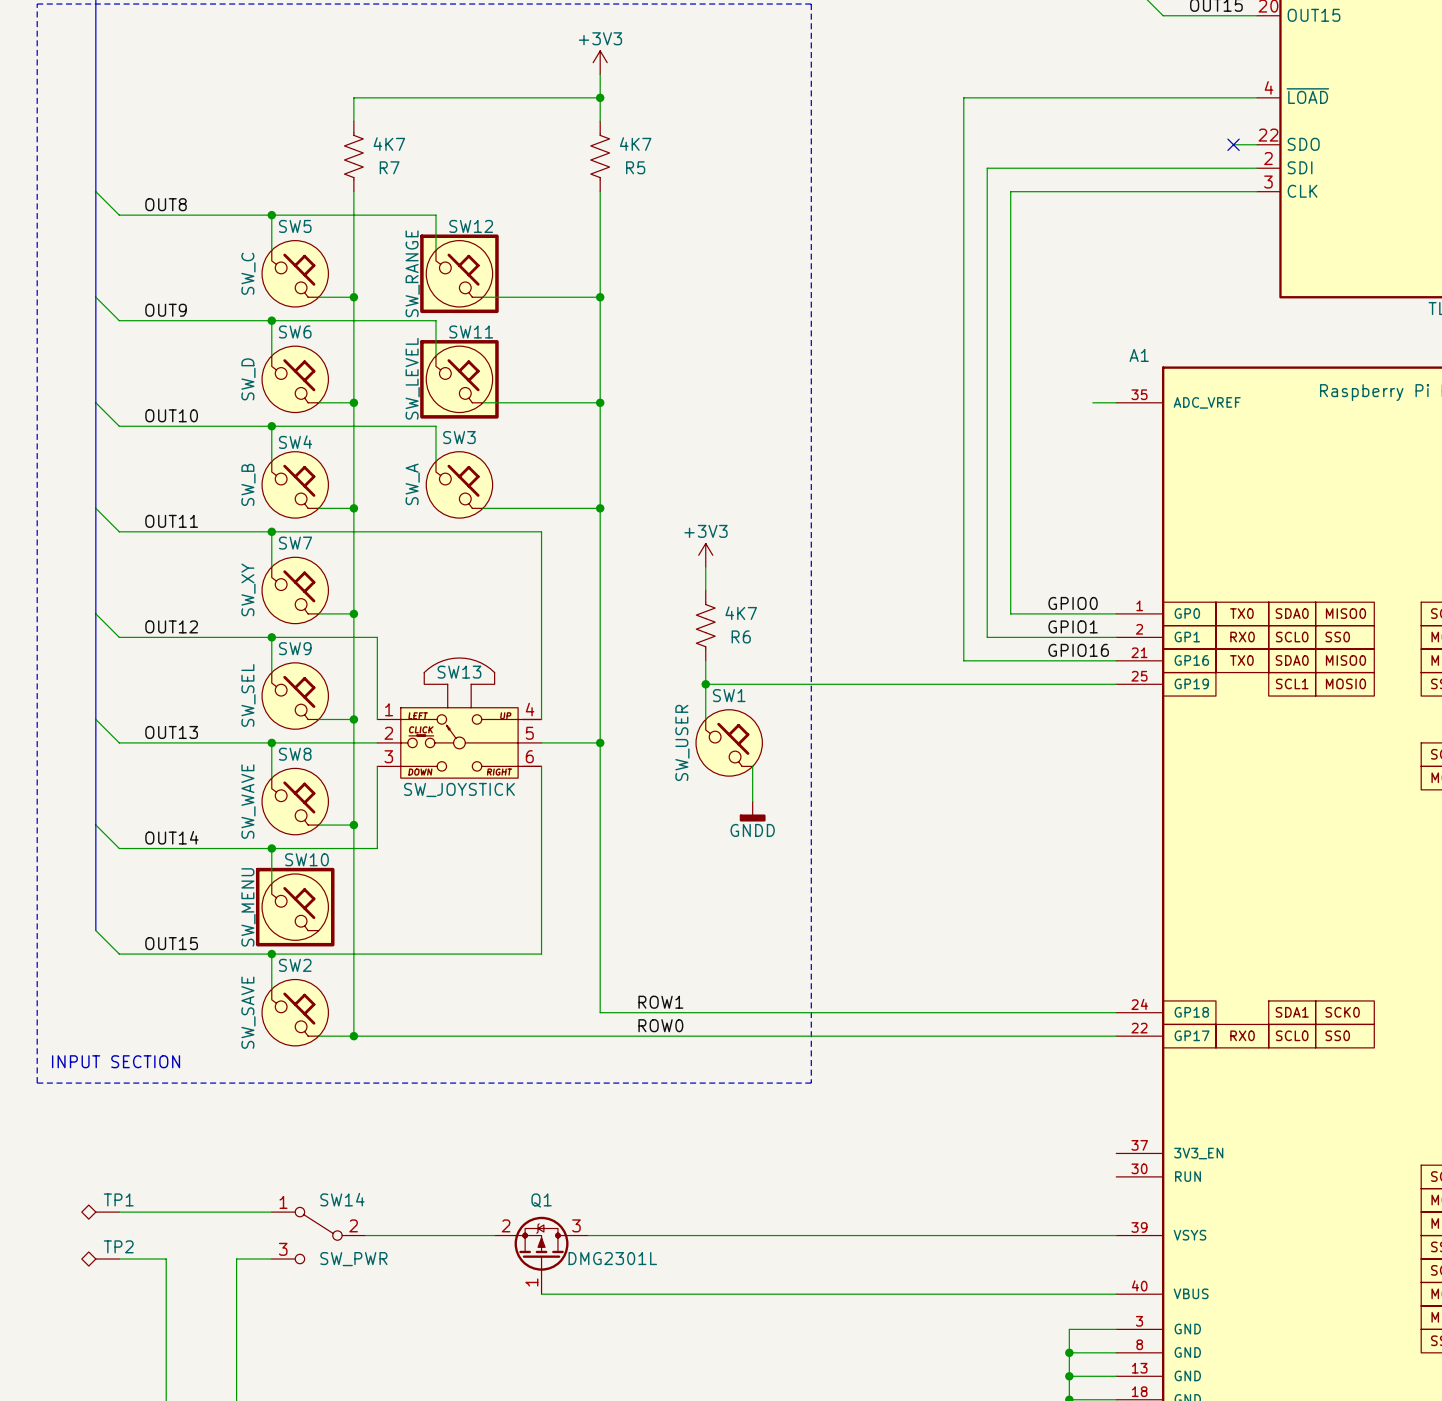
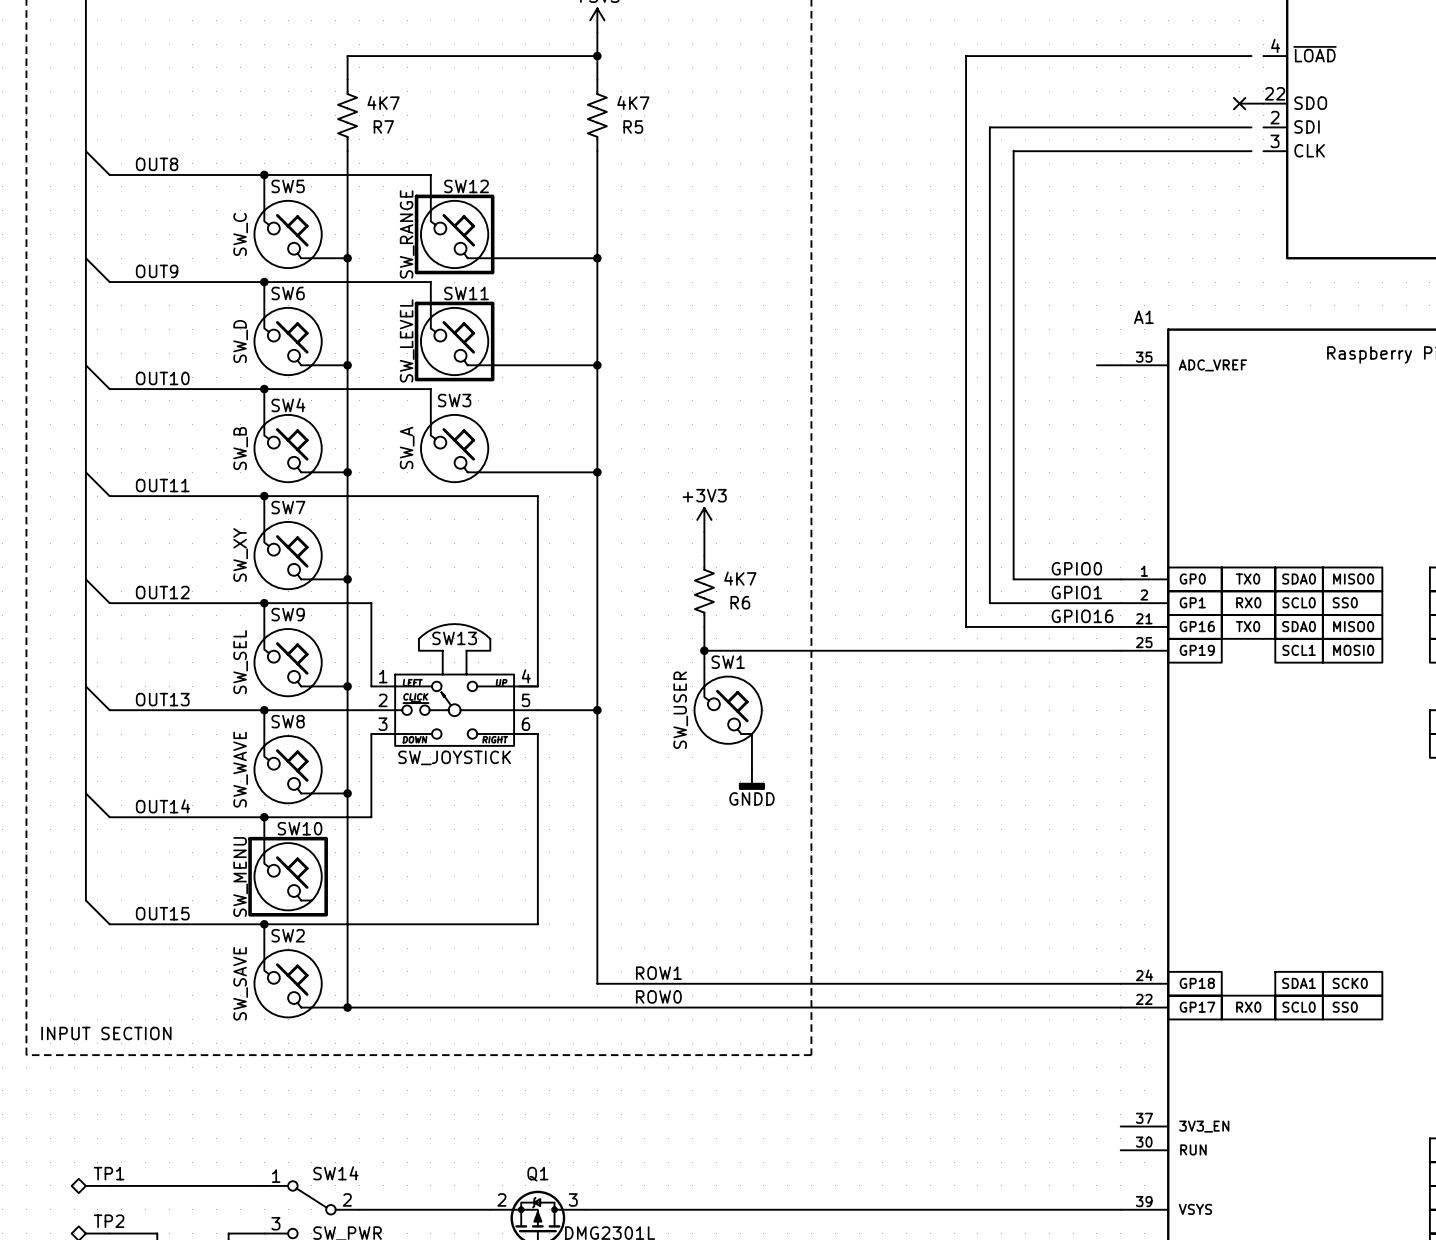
wire: (1245, 97) (1257, 97) -> none
wire: (1245, 168) (1257, 168) -> none
wire: (1245, 191) (1257, 191) -> none

